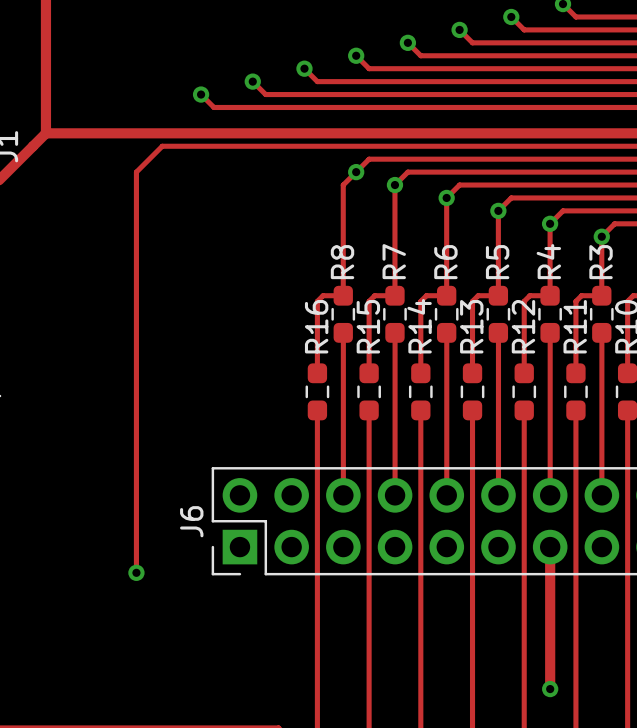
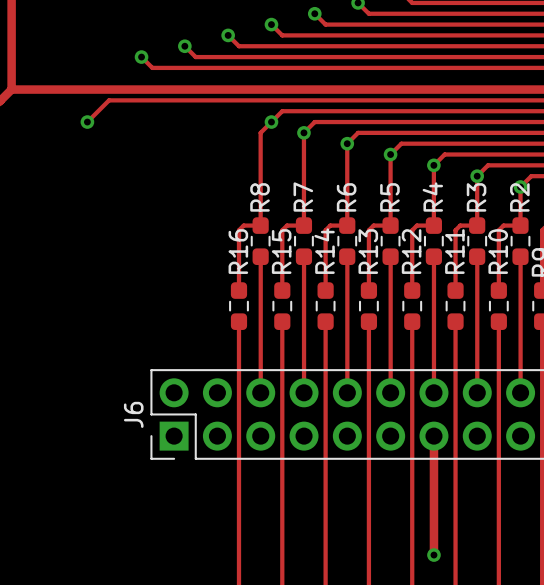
track: (136, 172) (136, 572) -> none
via: none -> (87, 122)
via: (136, 572) -> none

